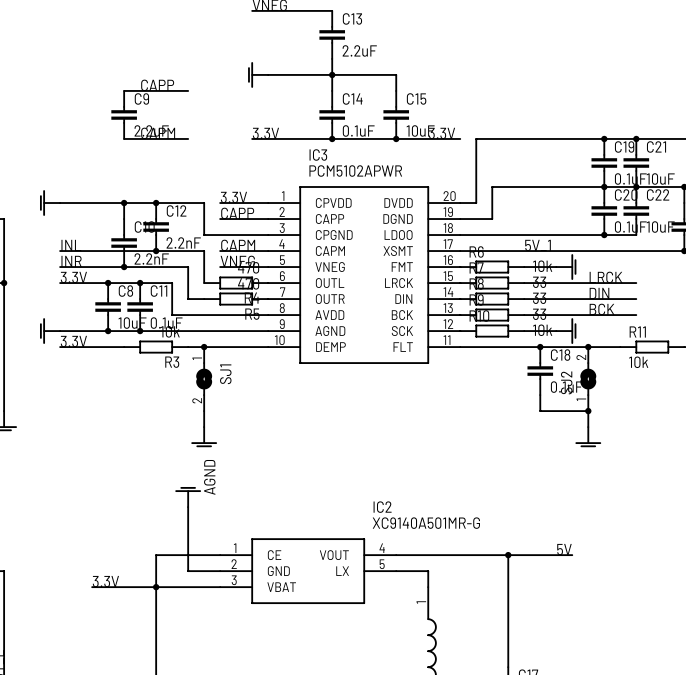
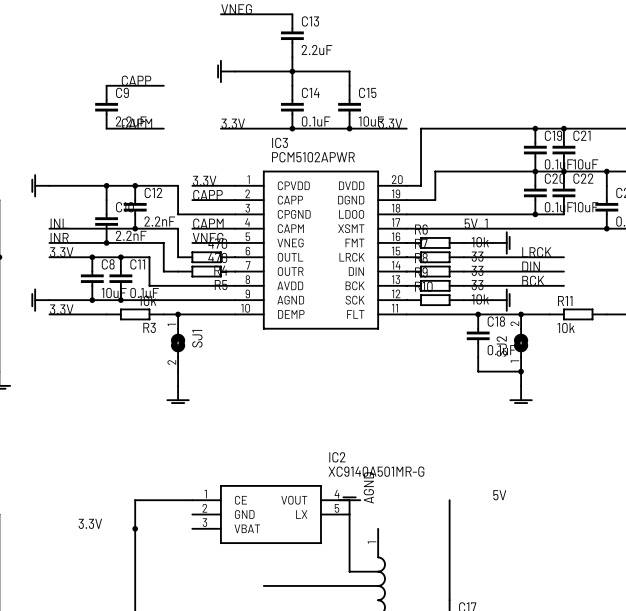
power symbol: AGND (188, 497) -> none
wire: (188, 507) (188, 571) (220, 571) -> none
wire: (396, 555) (572, 555) -> none
junction: (508, 555) -> none
power symbol: none -> AGND (349, 505)
wire: (396, 571) (428, 571) (428, 587) -> (349, 514) (349, 571) (378, 571)
wire: (92, 587) (220, 587) -> none
wire: none -> (263, 585) (378, 585)

